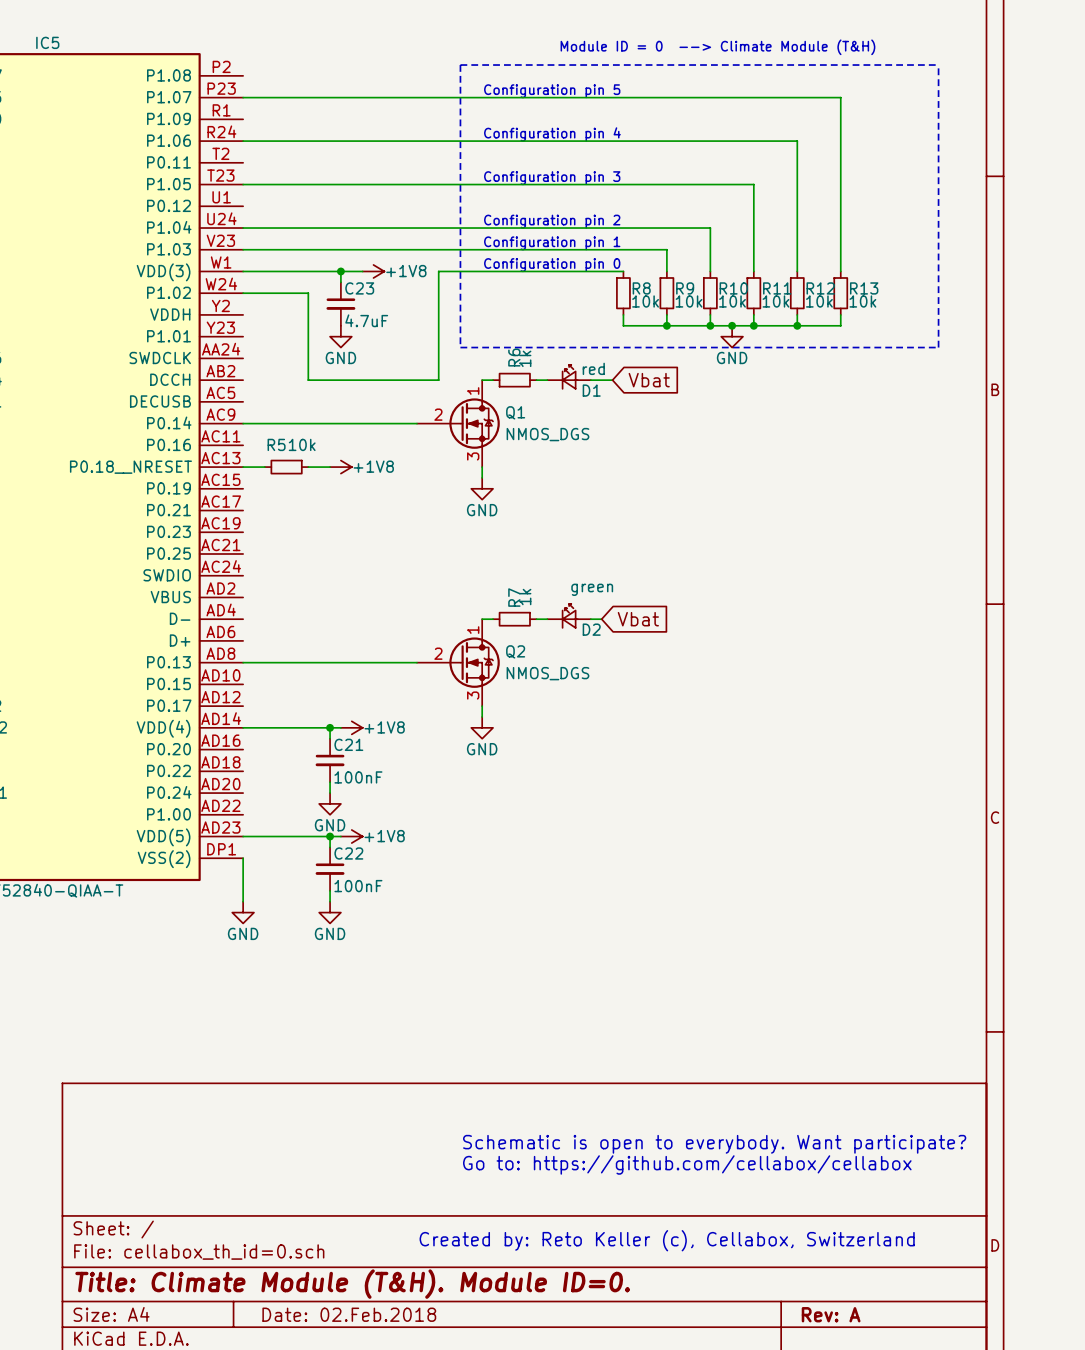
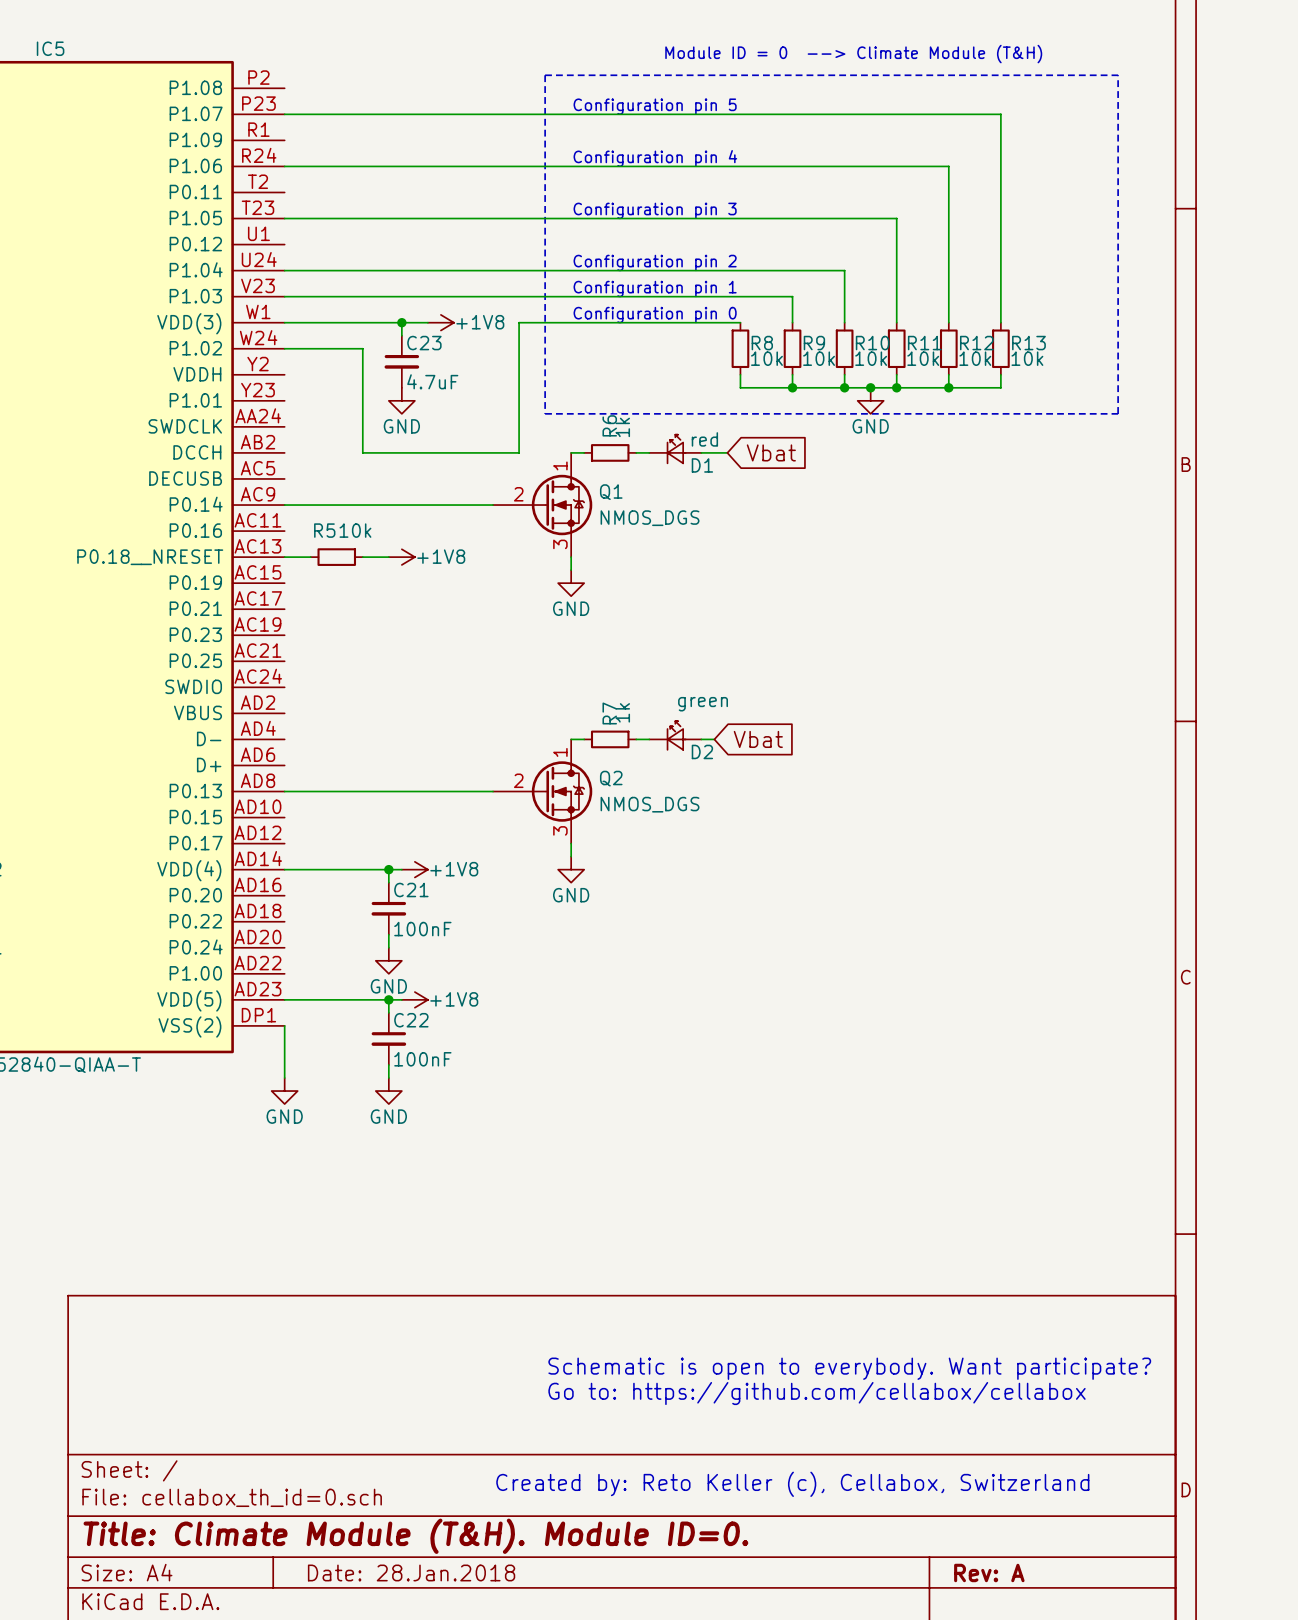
title block: Date: 02.Feb.2018 (349, 1314) -> Date: 28.Jan.2018 (411, 1572)

